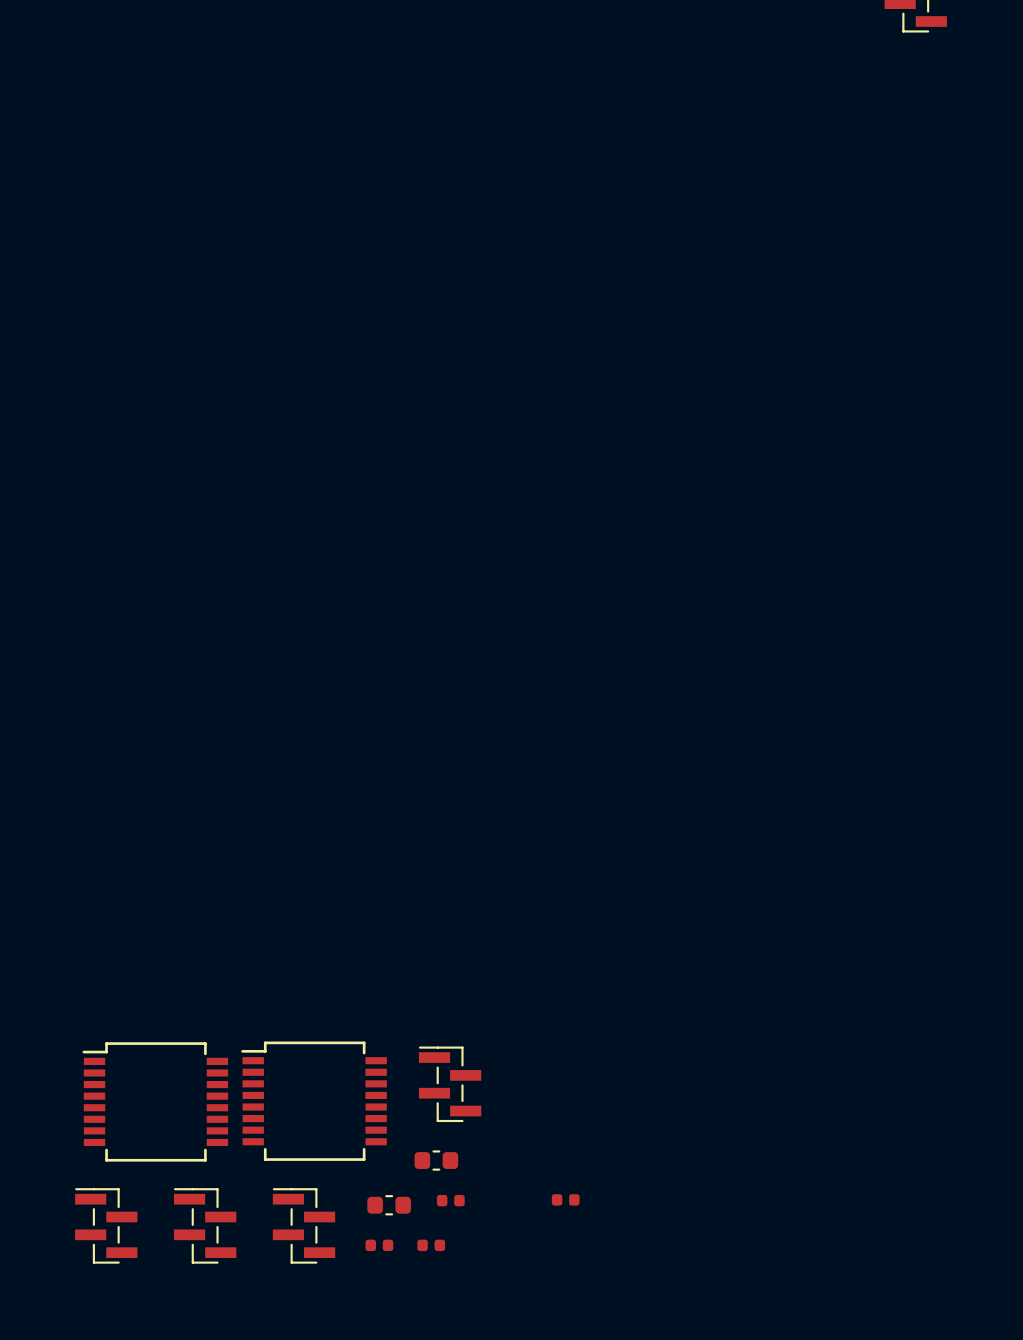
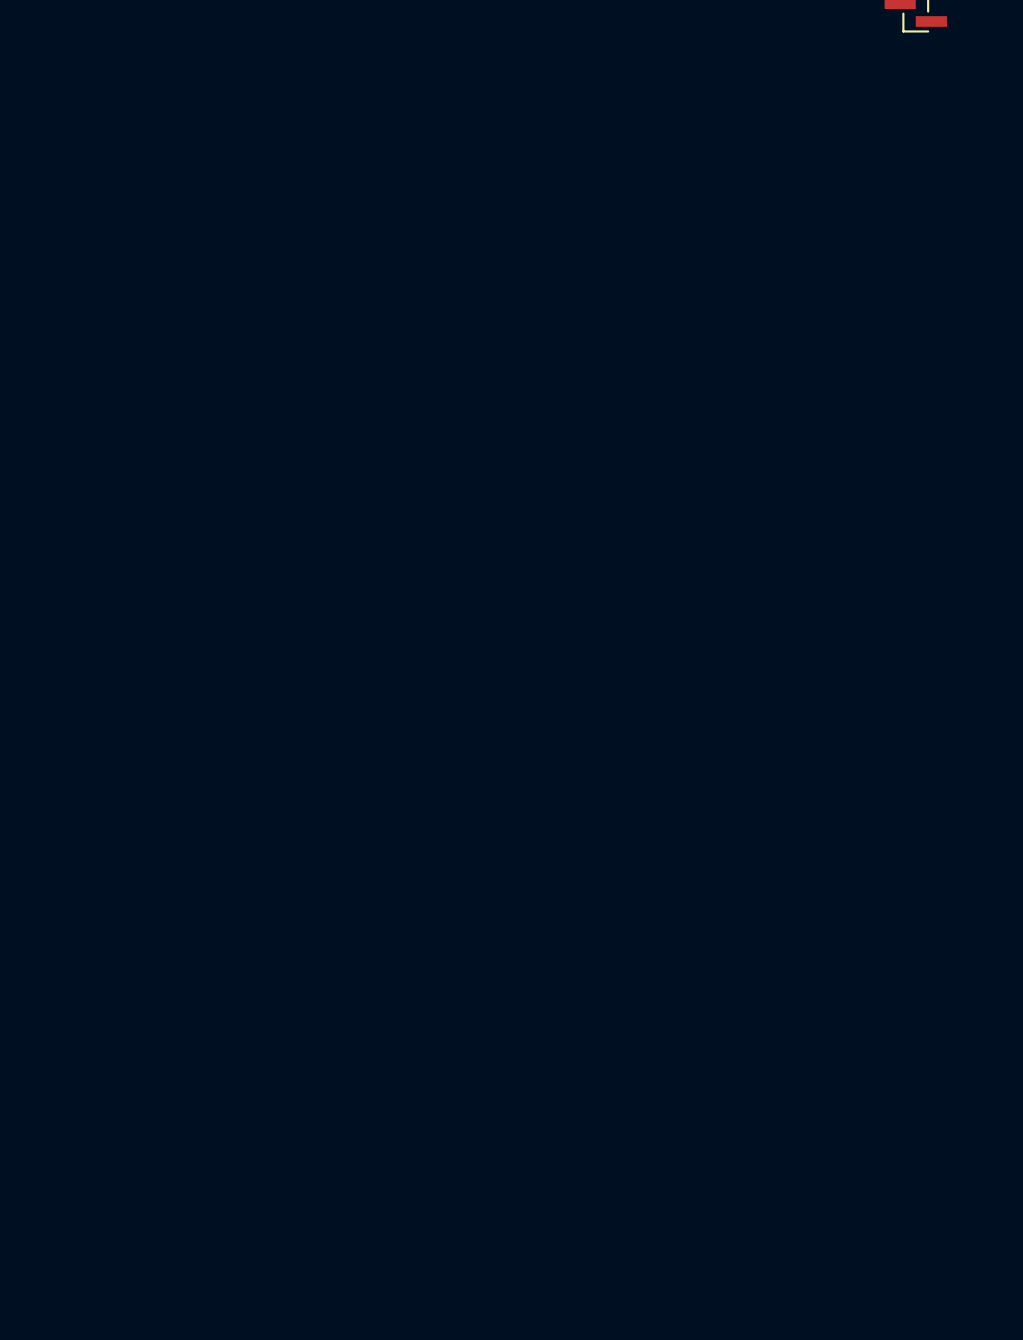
part: (450, 1084) -> none
part: (155, 1101) -> none
part: (314, 1101) -> none
part: (436, 1160) -> none
part: (565, 1199) -> none
part: (450, 1200) -> none
part: (389, 1205) -> none
part: (106, 1225) -> none
part: (205, 1225) -> none
part: (304, 1225) -> none
part: (379, 1245) -> none
part: (431, 1245) -> none

